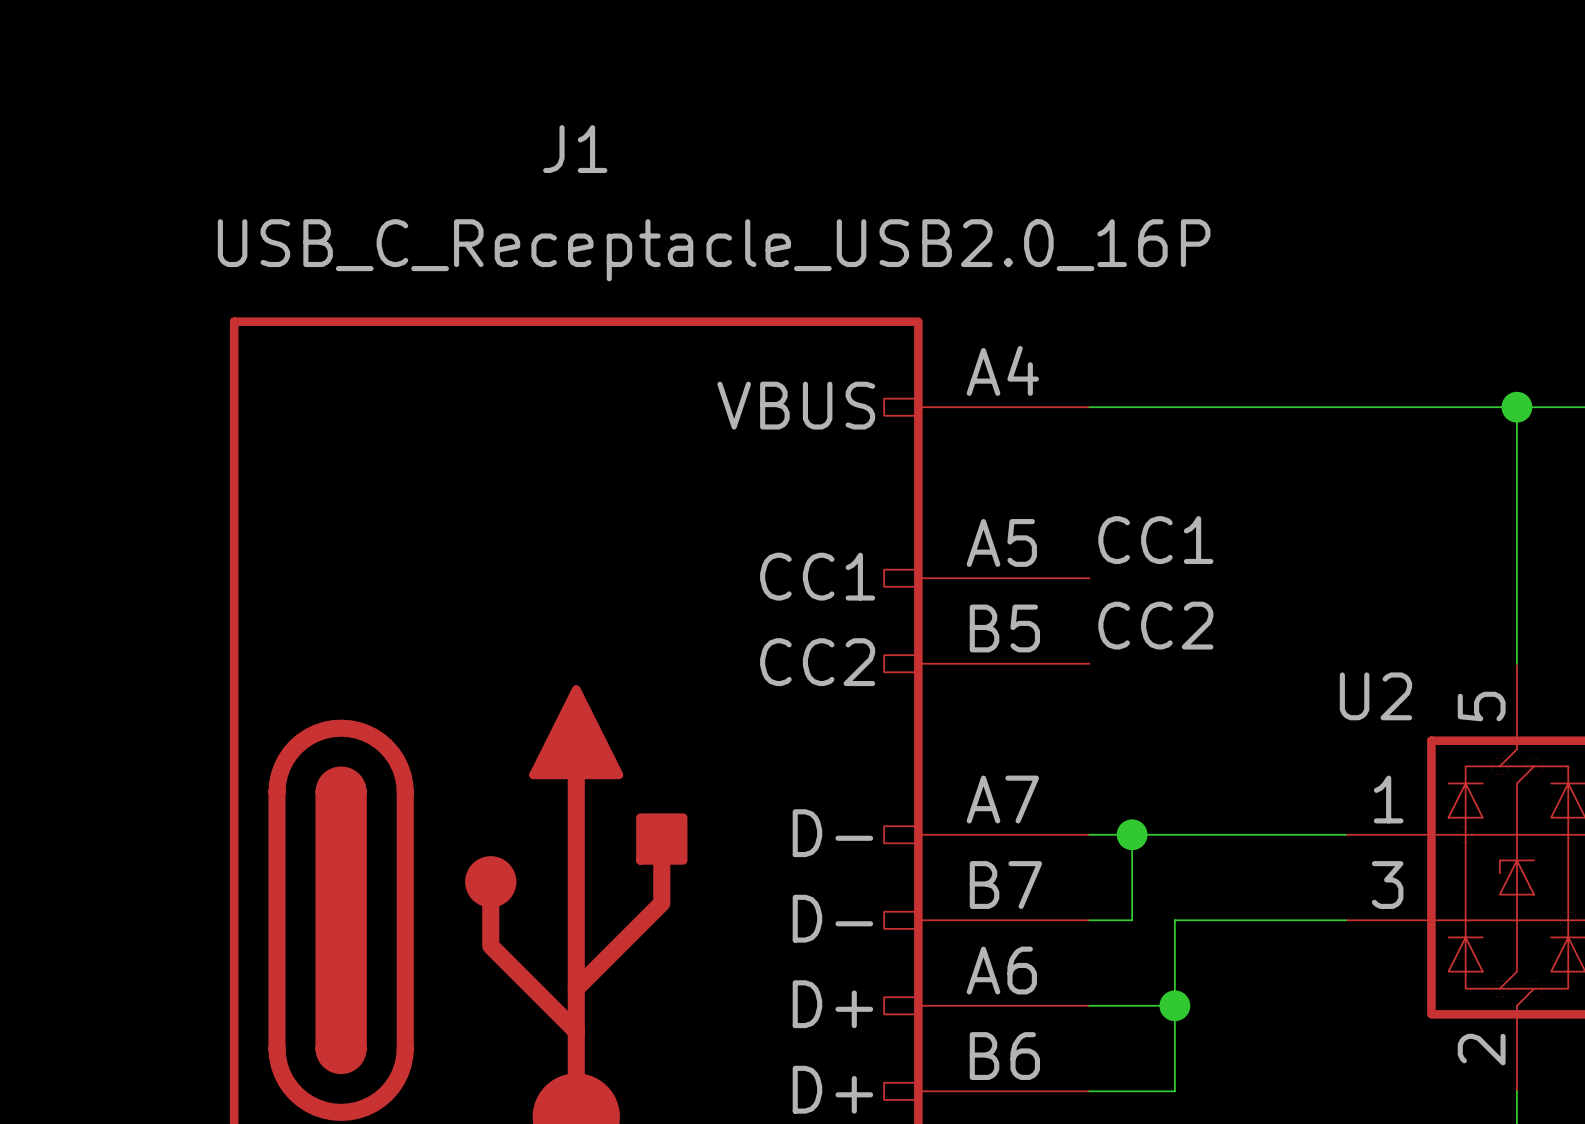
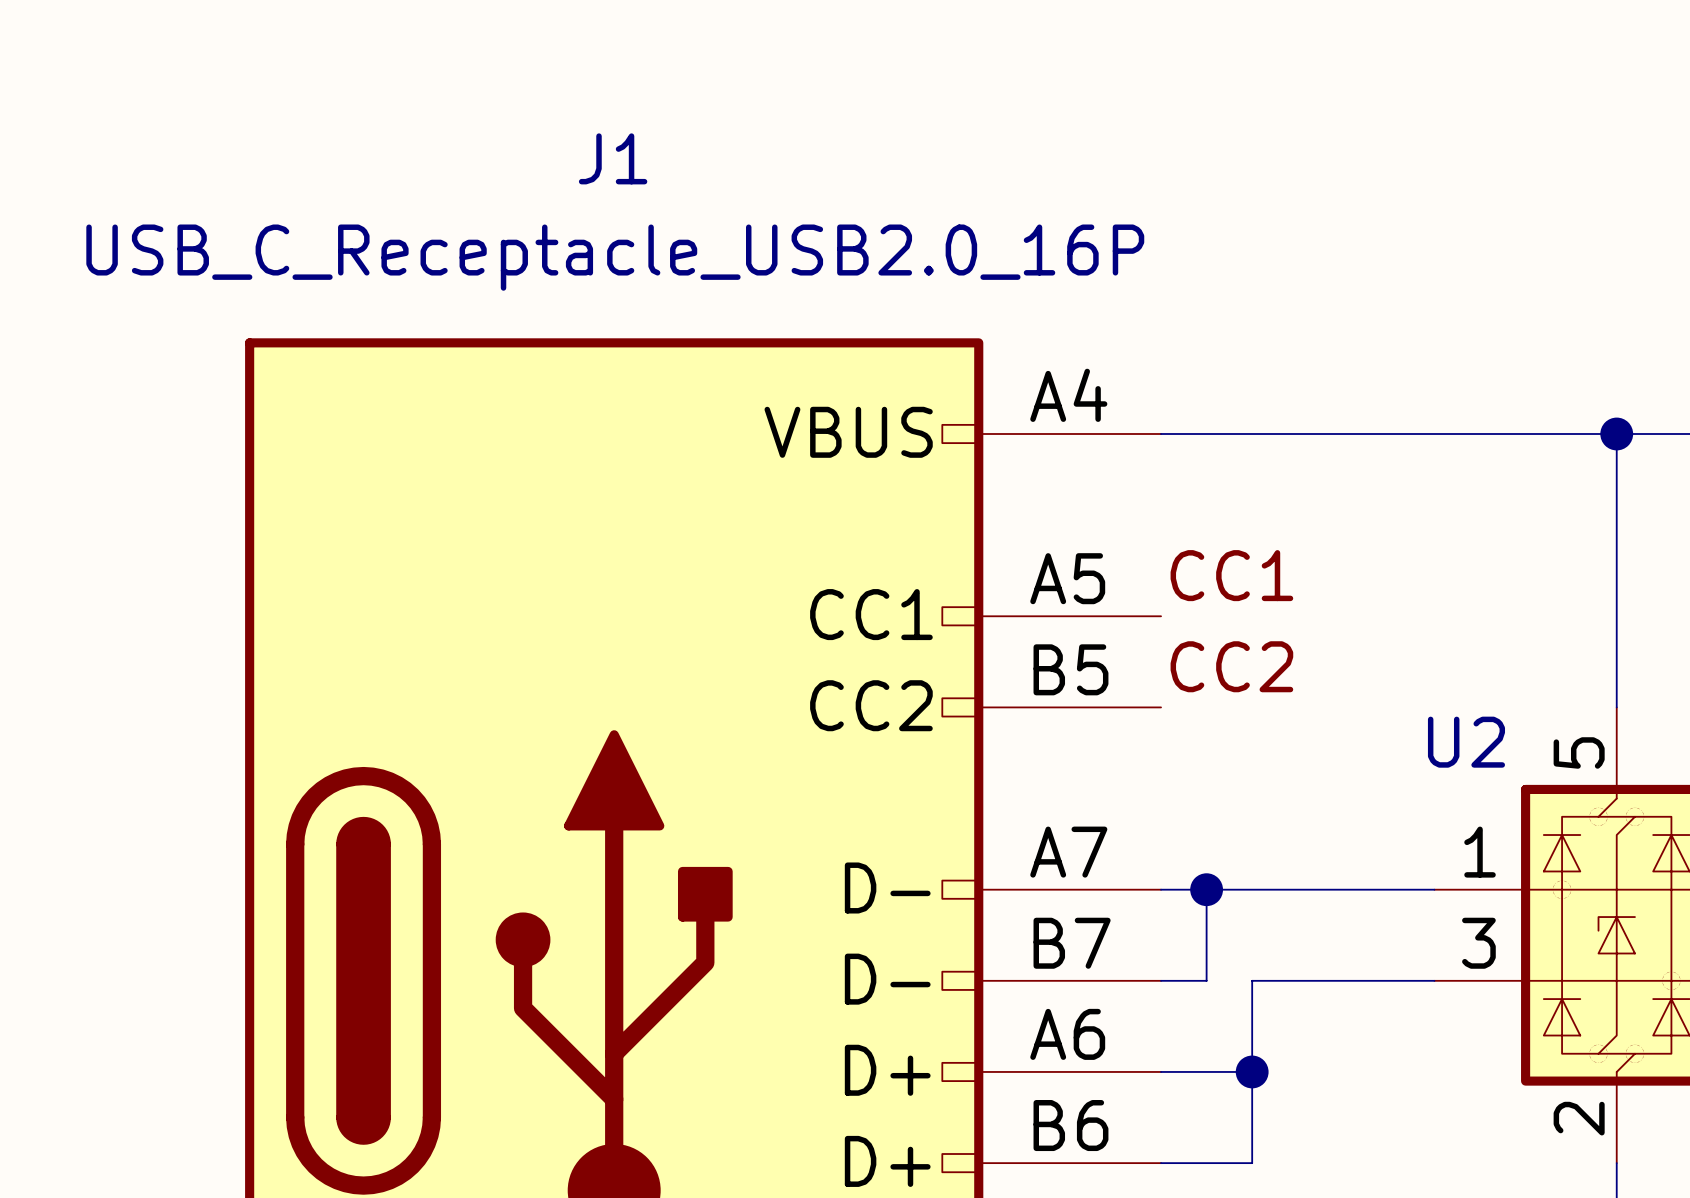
J1 value position: USB_C_Receptacle_USB2.0_16P (714, 250) -> USB_C_Receptacle_USB2.0_16P (615, 257)

